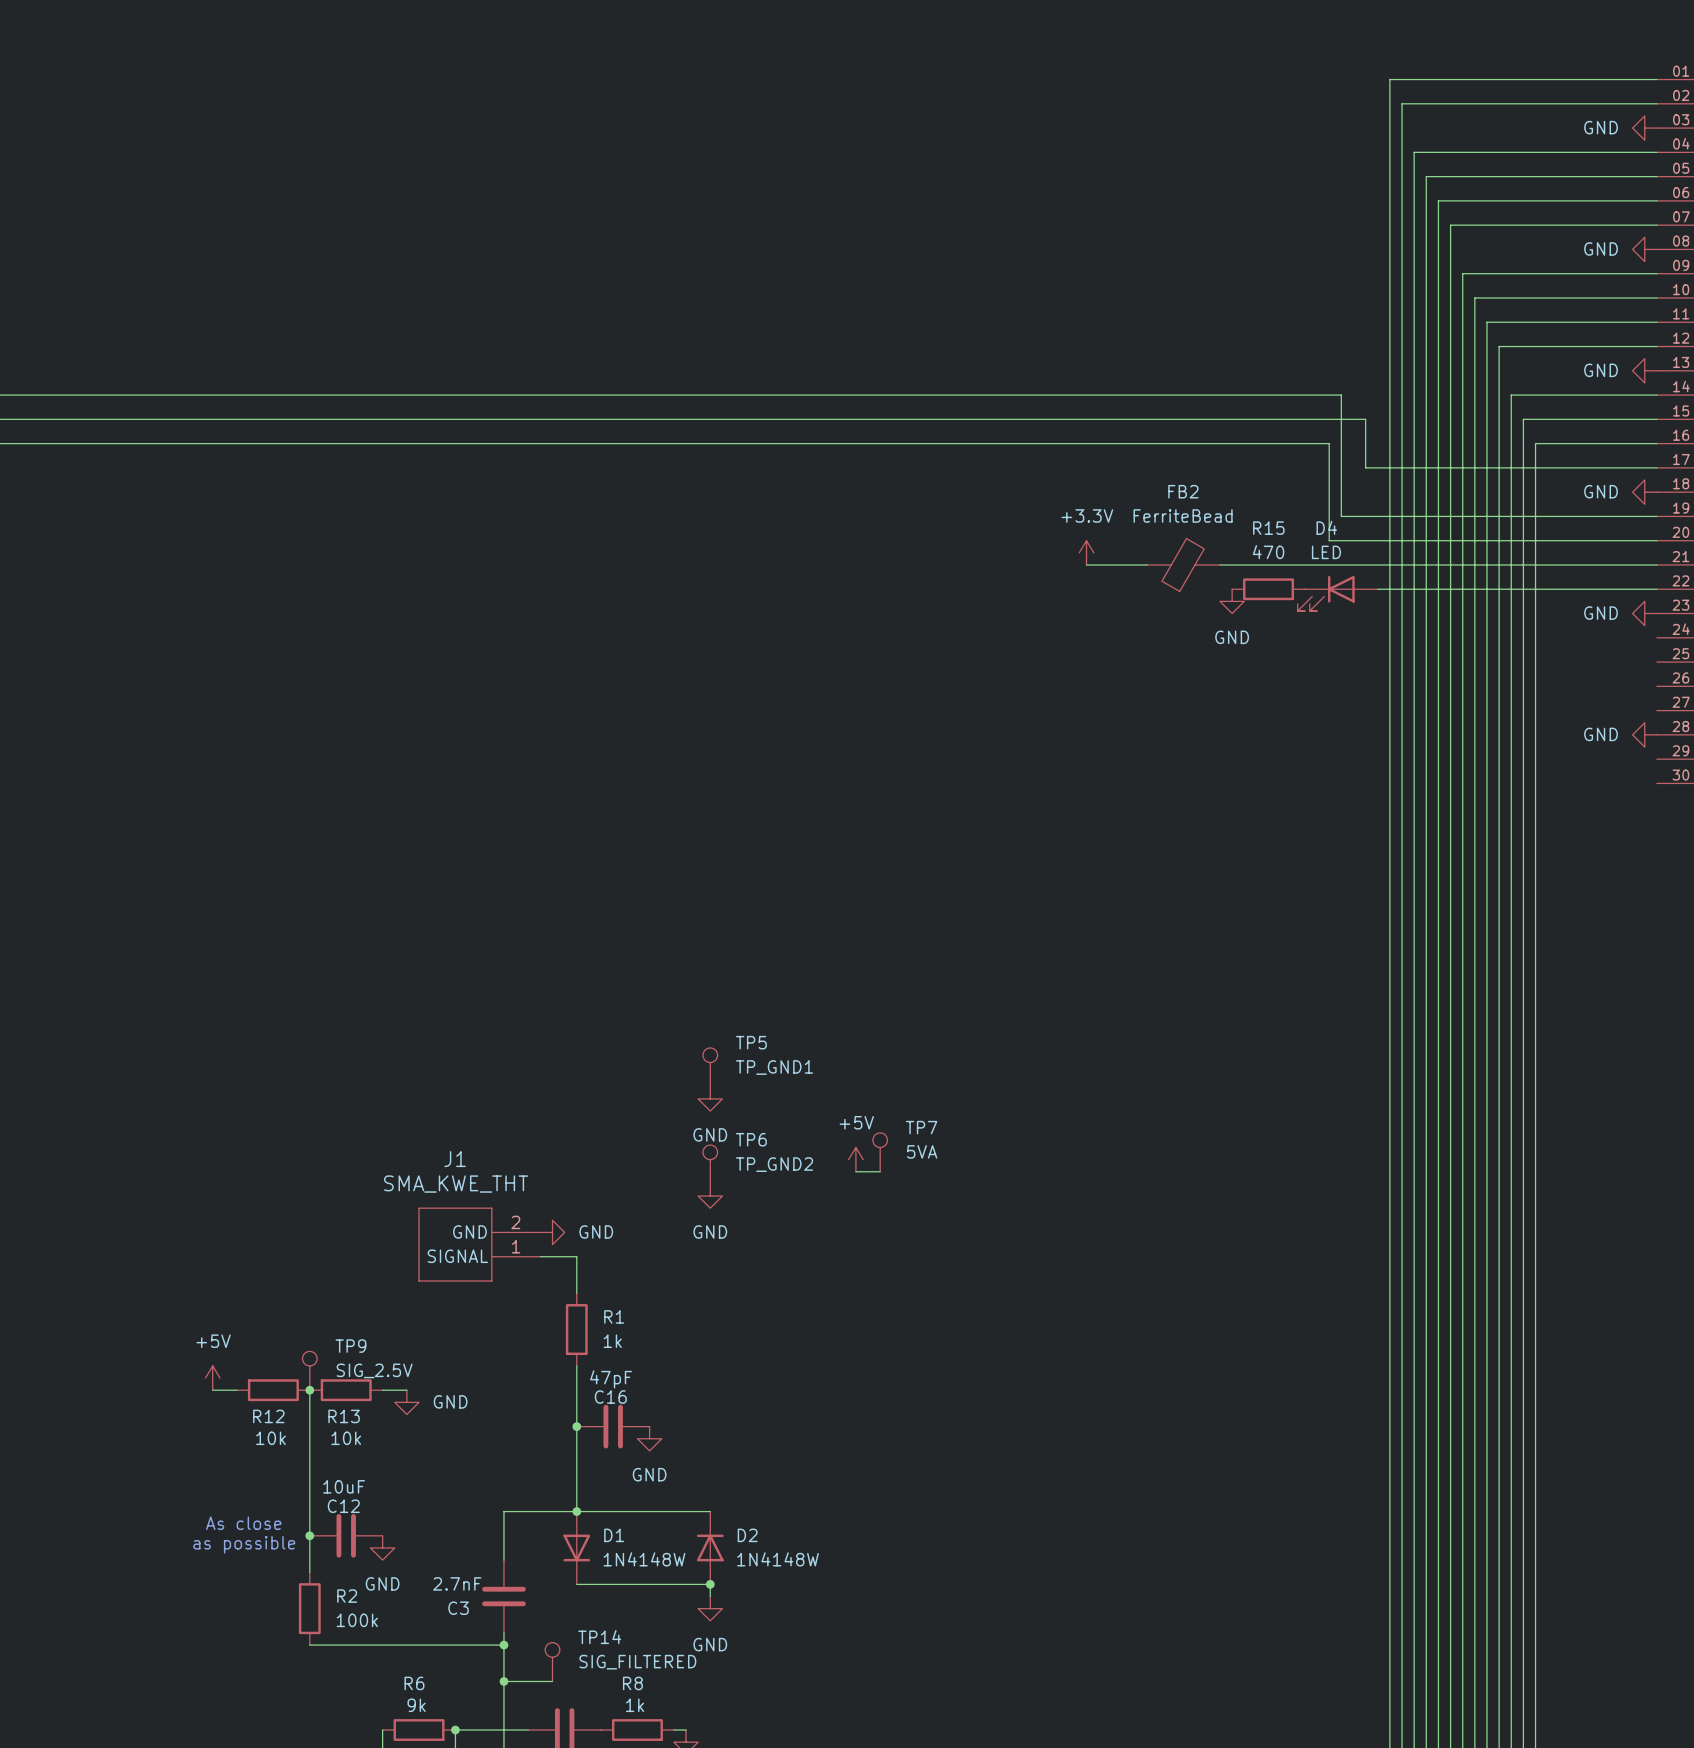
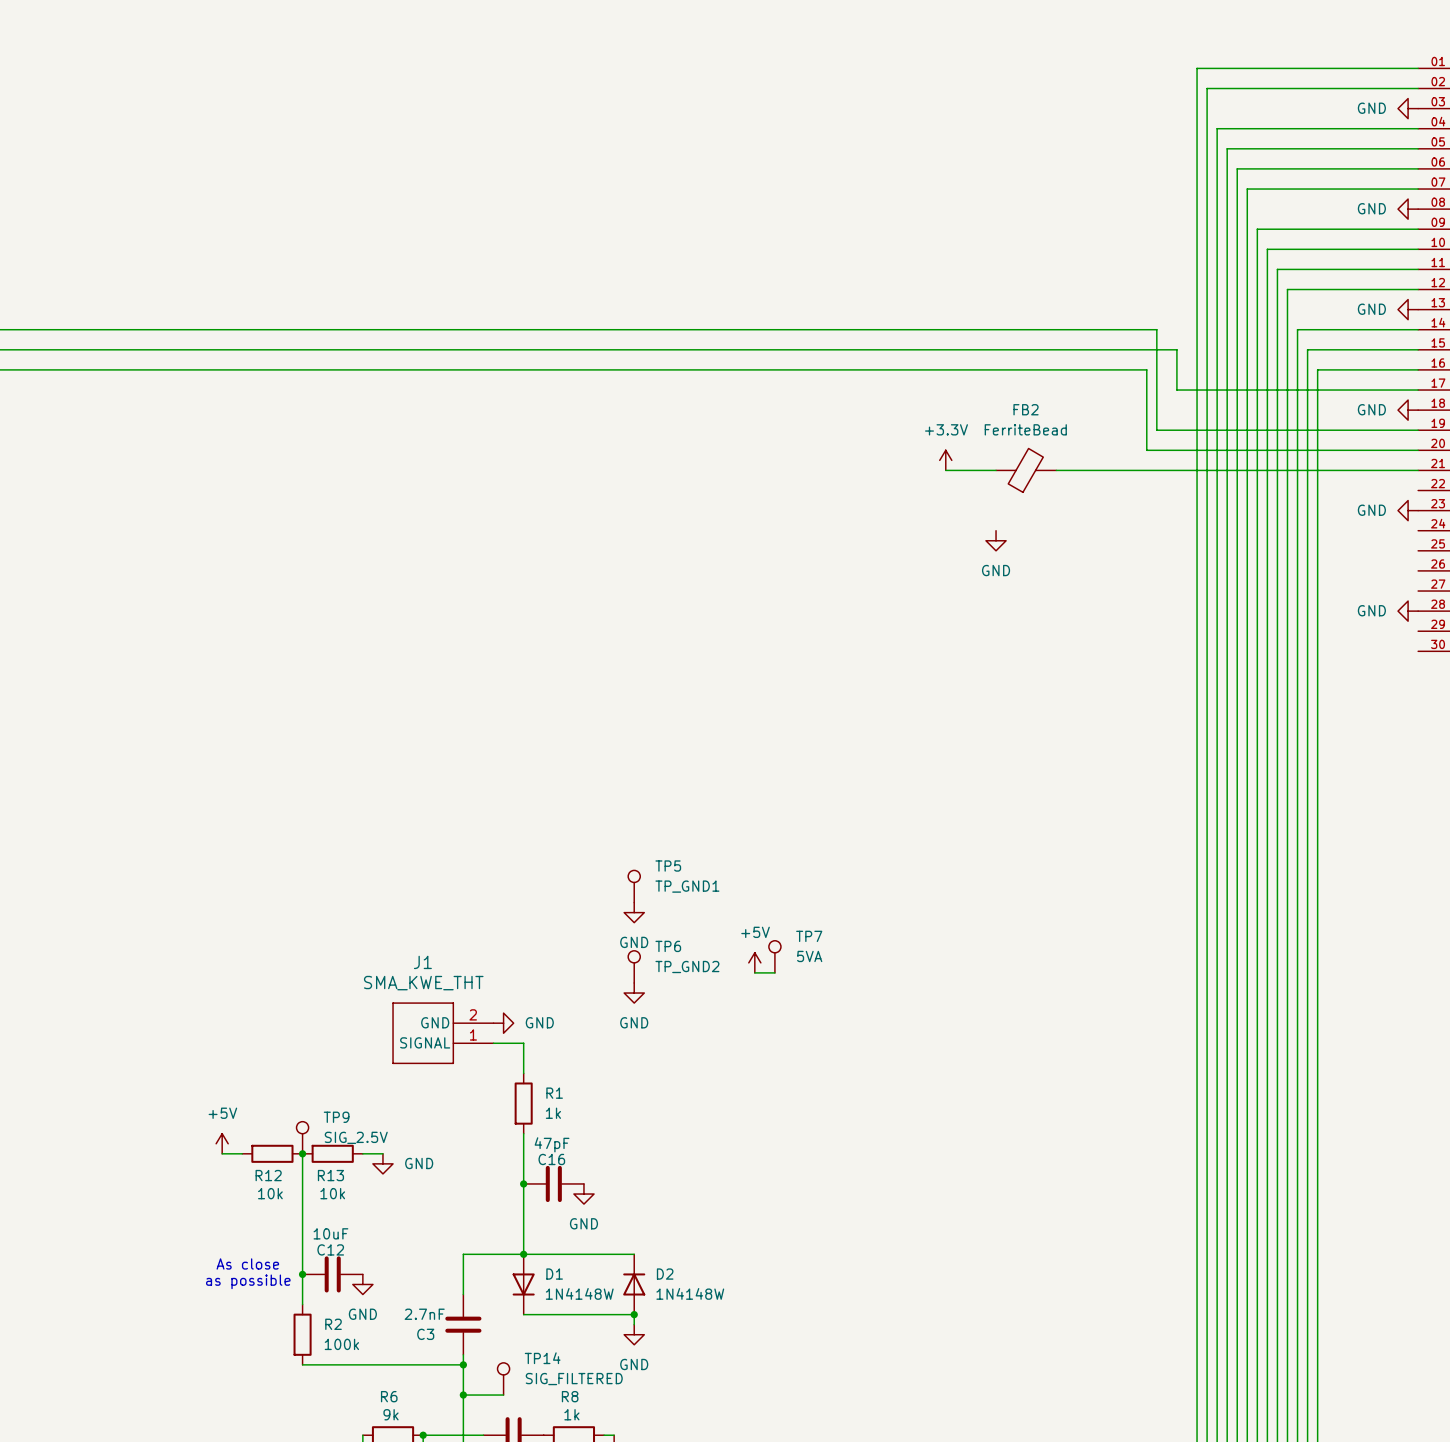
R15: 470 (1268, 589) -> none
wire: (1377, 589) (1656, 589) -> none
D4: LED (1337, 593) -> none
power symbol position: GND (1232, 601) -> GND (996, 540)

